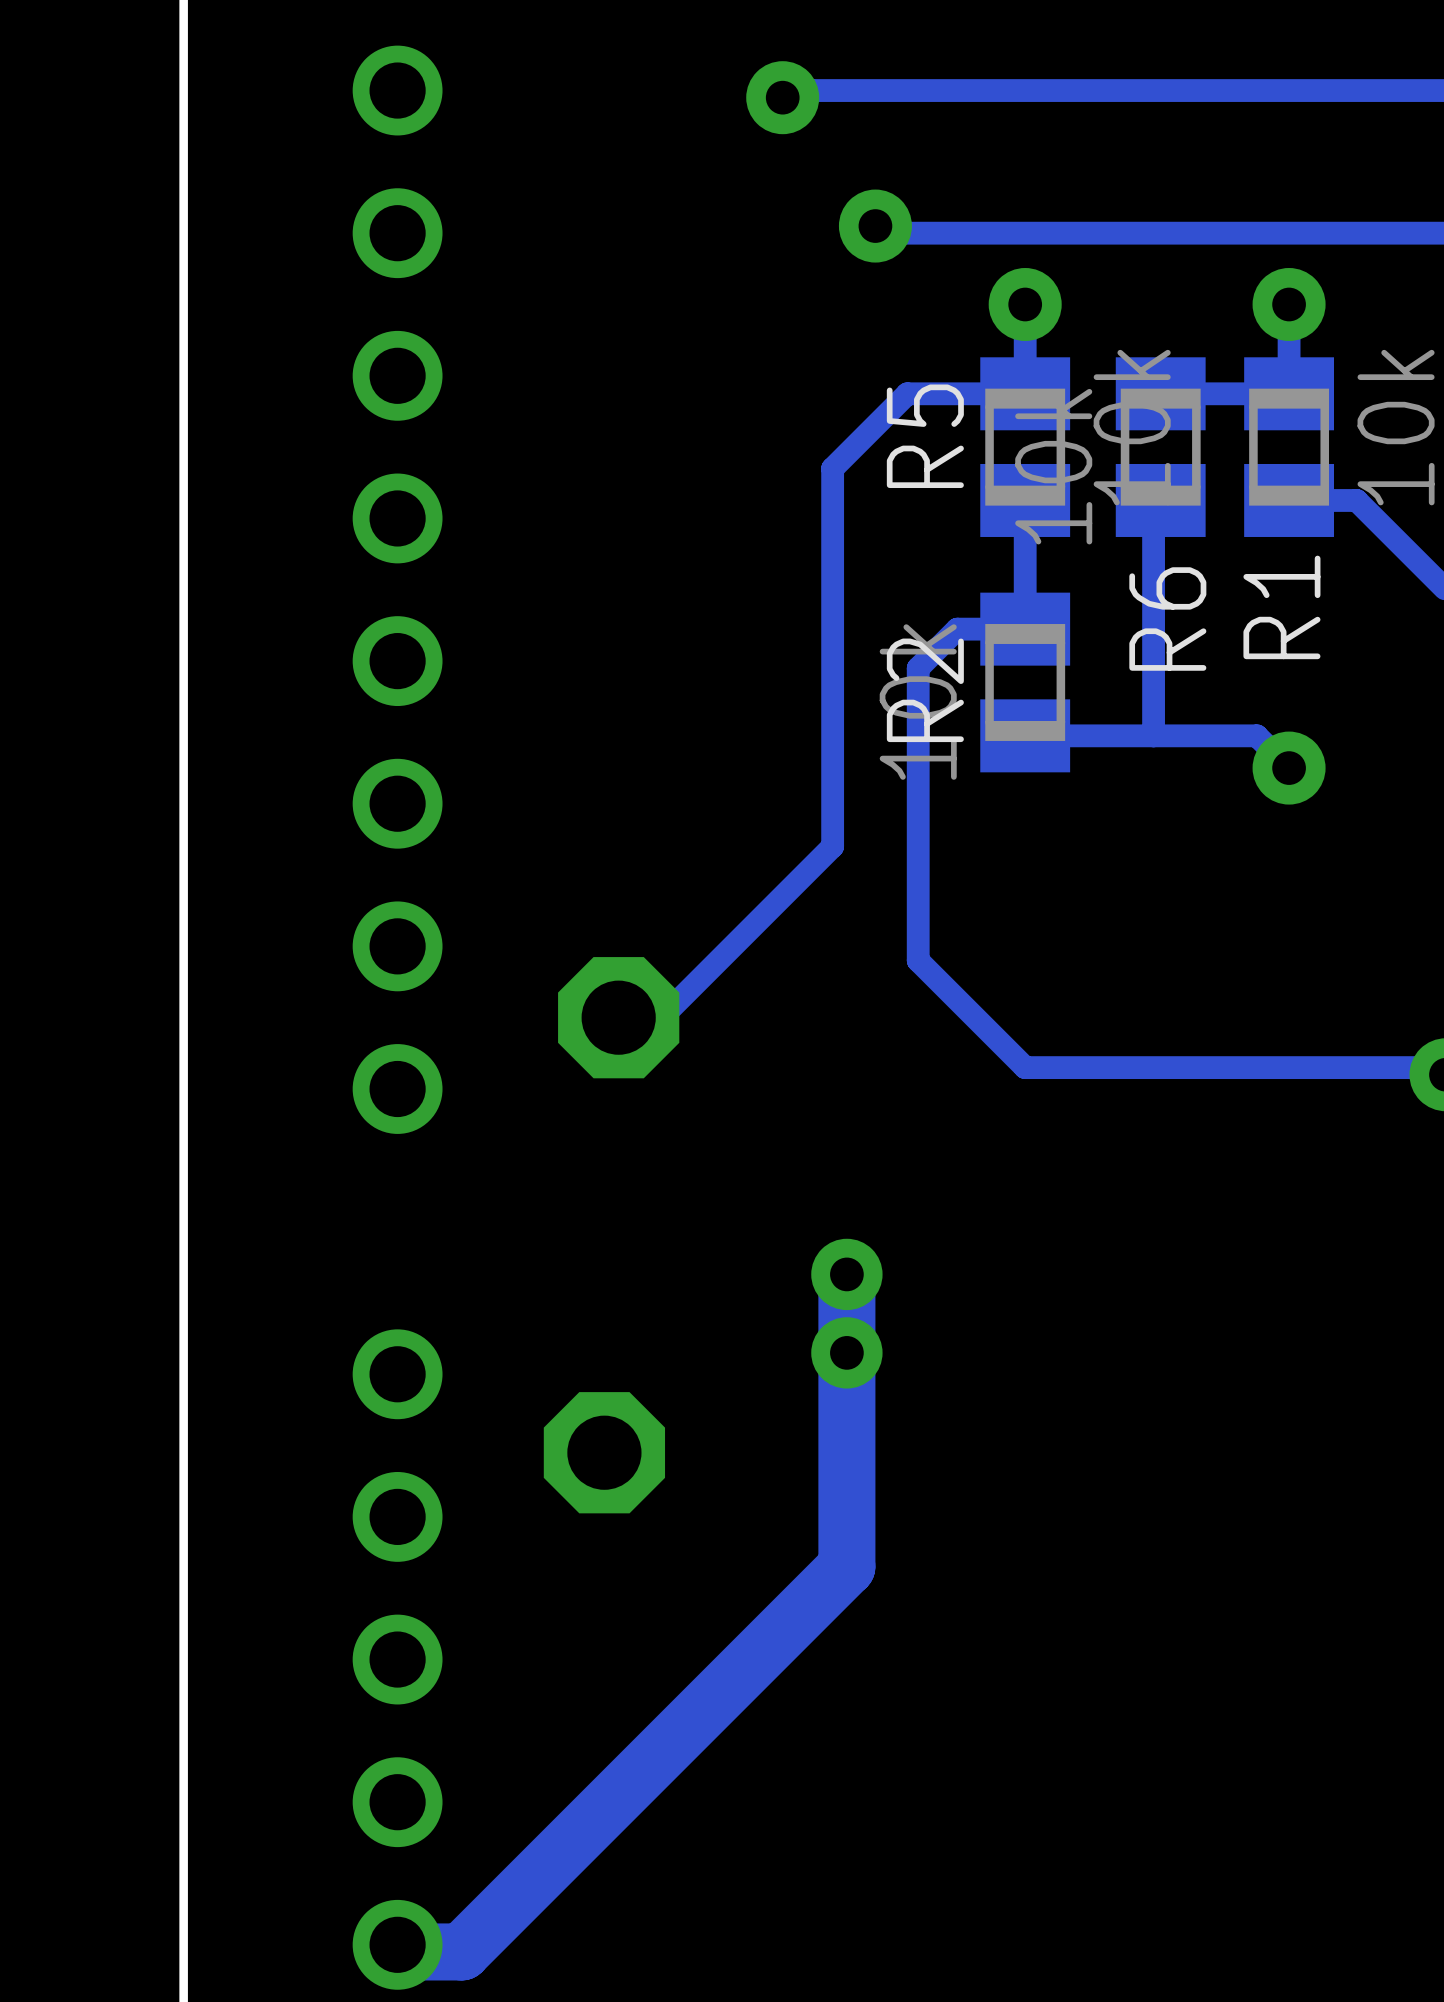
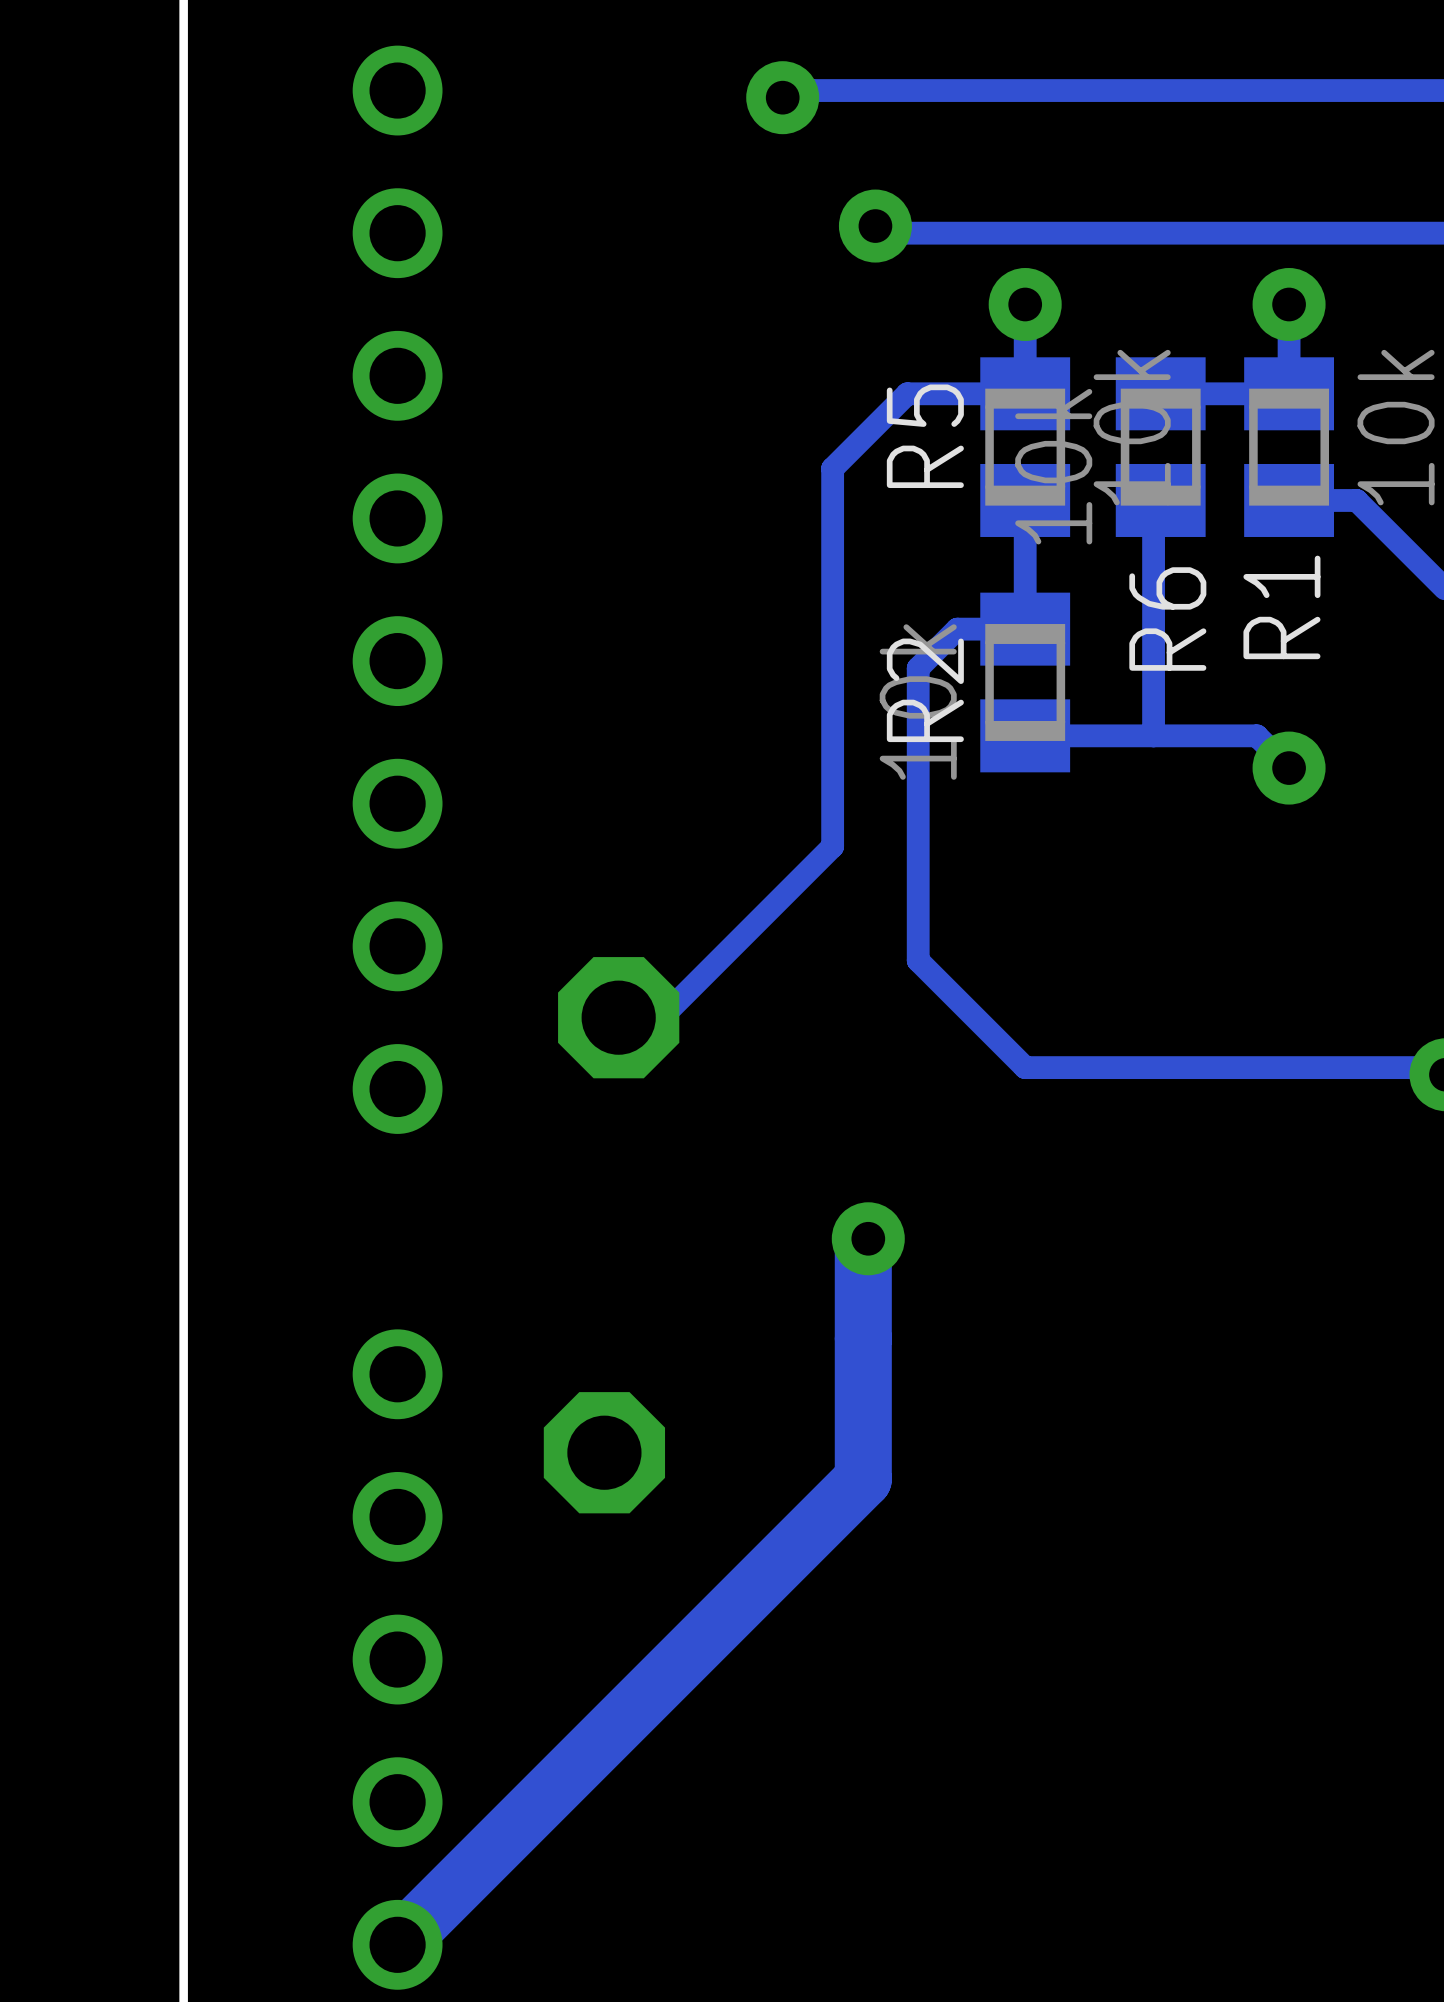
track: (846, 1274) (846, 1566) (461, 1951) (404, 1951) (397, 1944) -> (868, 1238) (863, 1243) (863, 1479) (397, 1944)
via position: (846, 1274) -> (868, 1238)
via: (846, 1352) -> none

